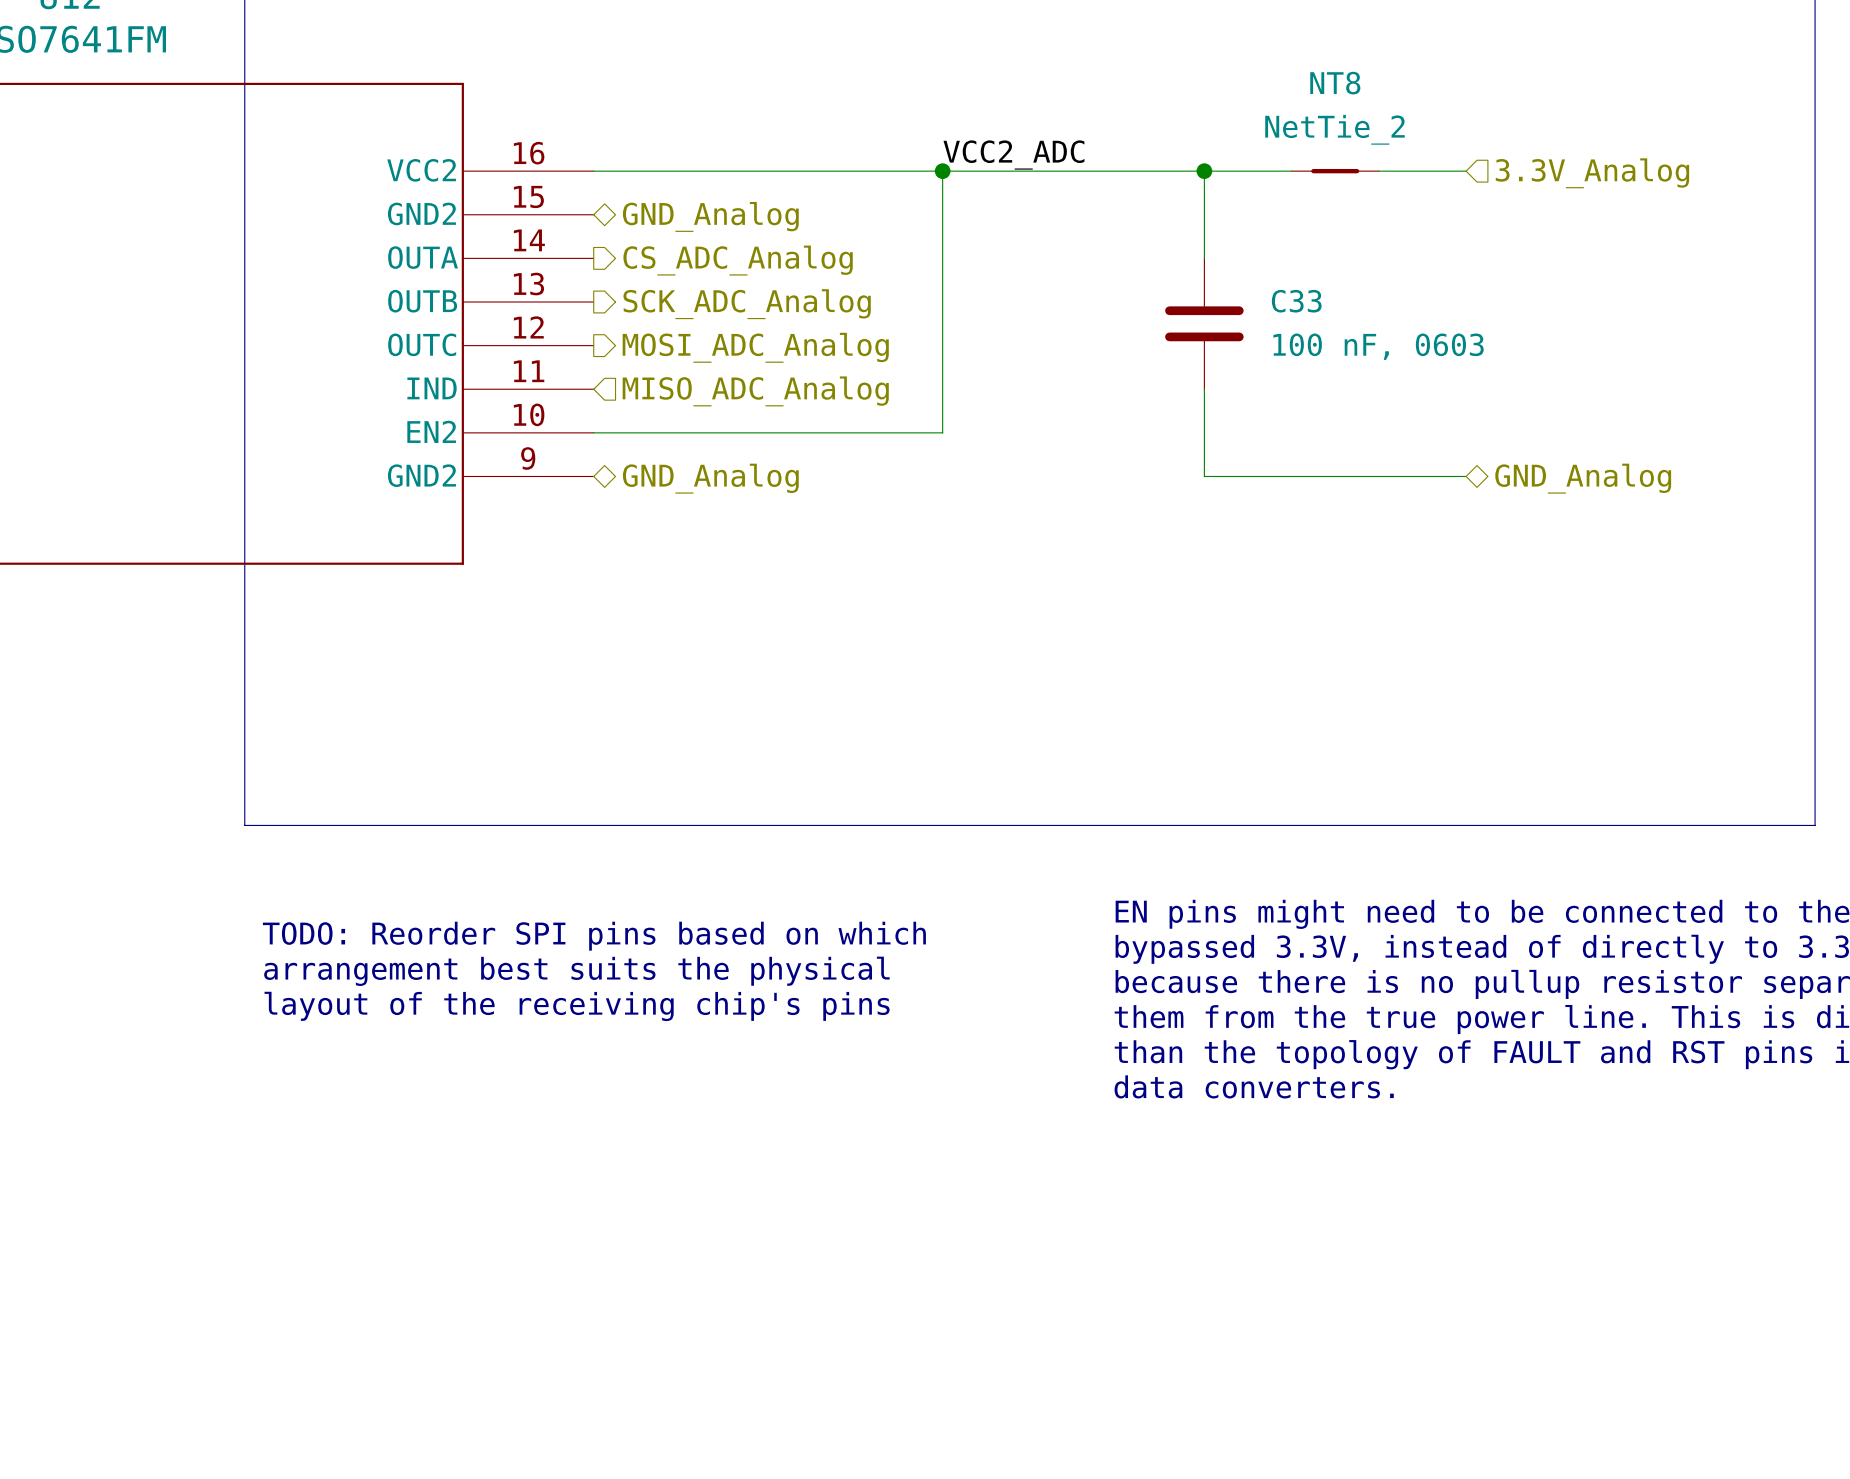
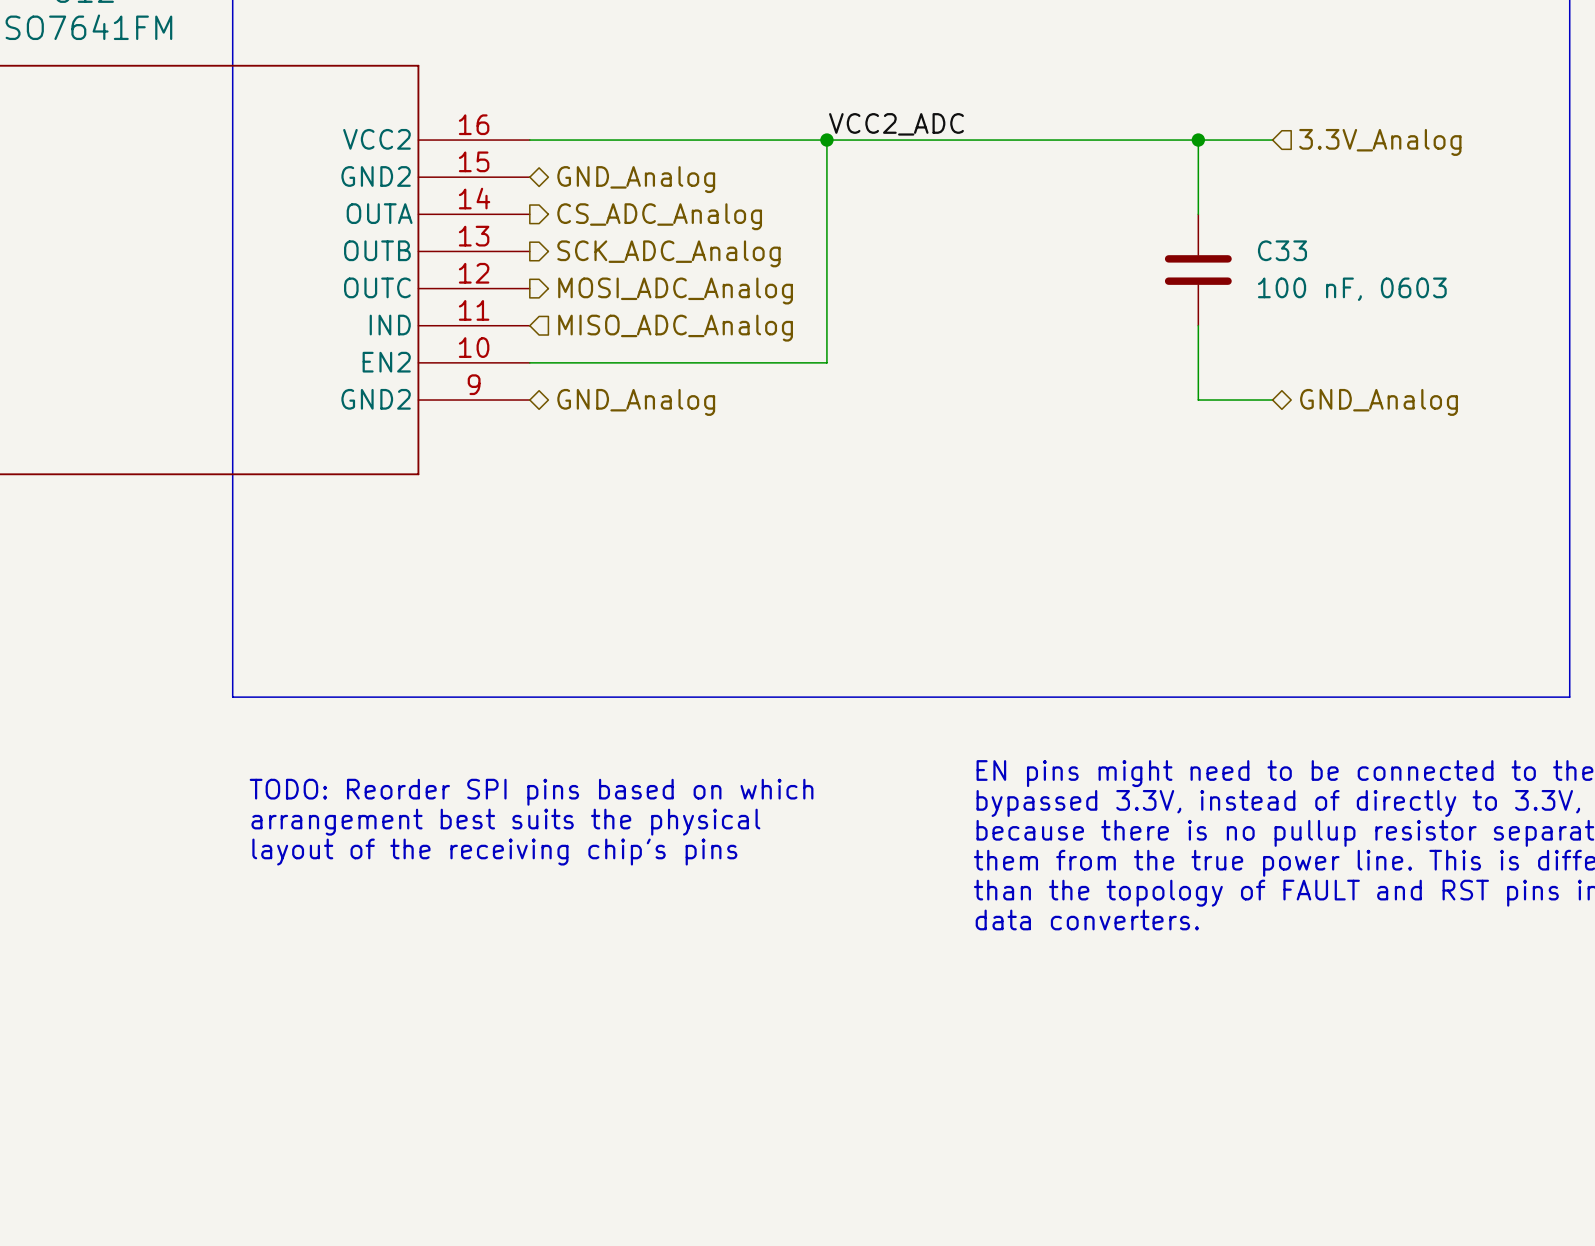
wire: (1204, 171) (1204, 258) -> none
junction: (1204, 171) -> none
wire: none -> (1124, 140) (1198, 140) (1198, 214)
NT8: NetTie_2 (1335, 171) -> none
junction: none -> (1198, 140)
C33 position: (1204, 323) -> (1198, 270)
wire: (1204, 389) (1204, 476) (1378, 476) -> (1198, 325) (1198, 400)

